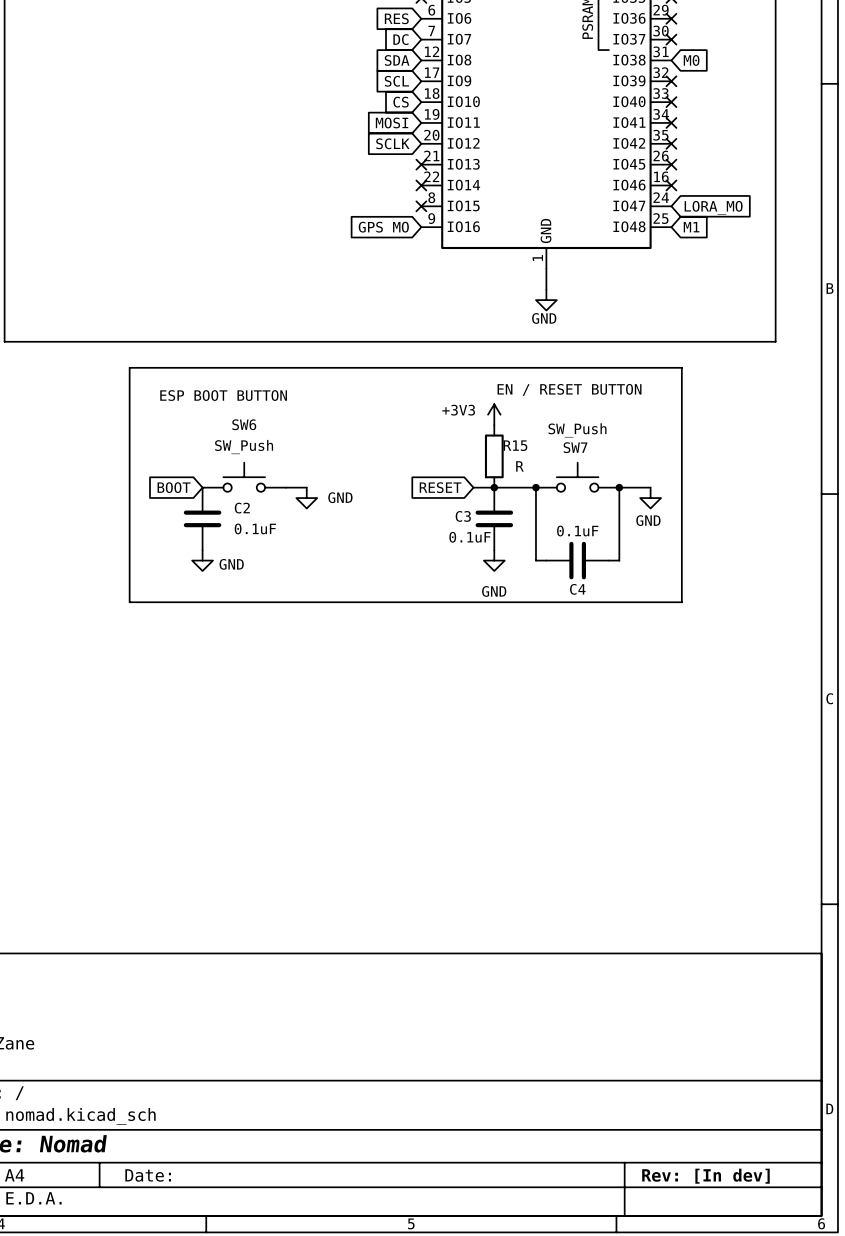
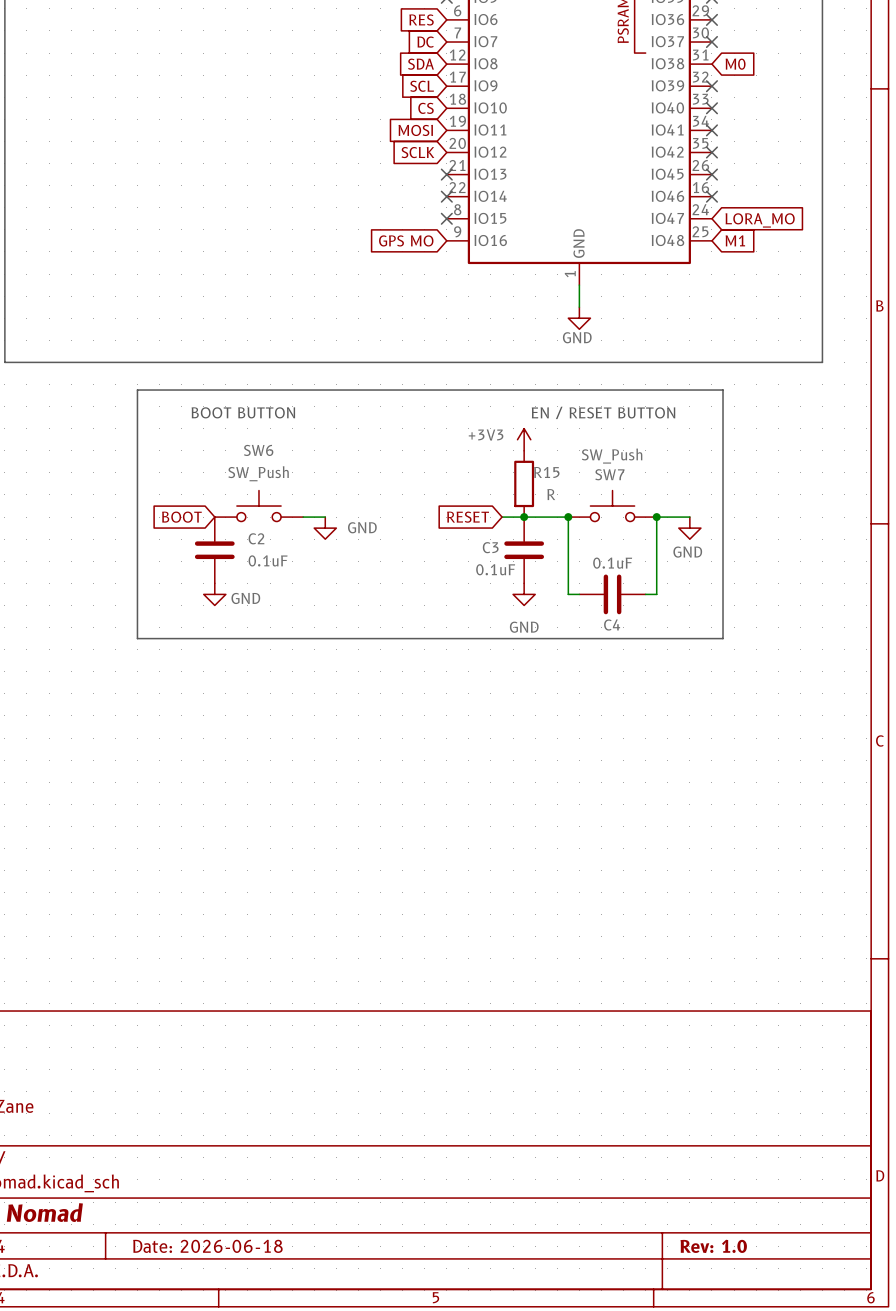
text: ESP BOOT BUTTON (223, 395) -> BOOT BUTTON (243, 412)
title block: Date: (148, 1175) -> Date: 2026-06-18 (207, 1246)
title block: Rev: [In dev] (705, 1176) -> Rev: 1.0 (713, 1246)

